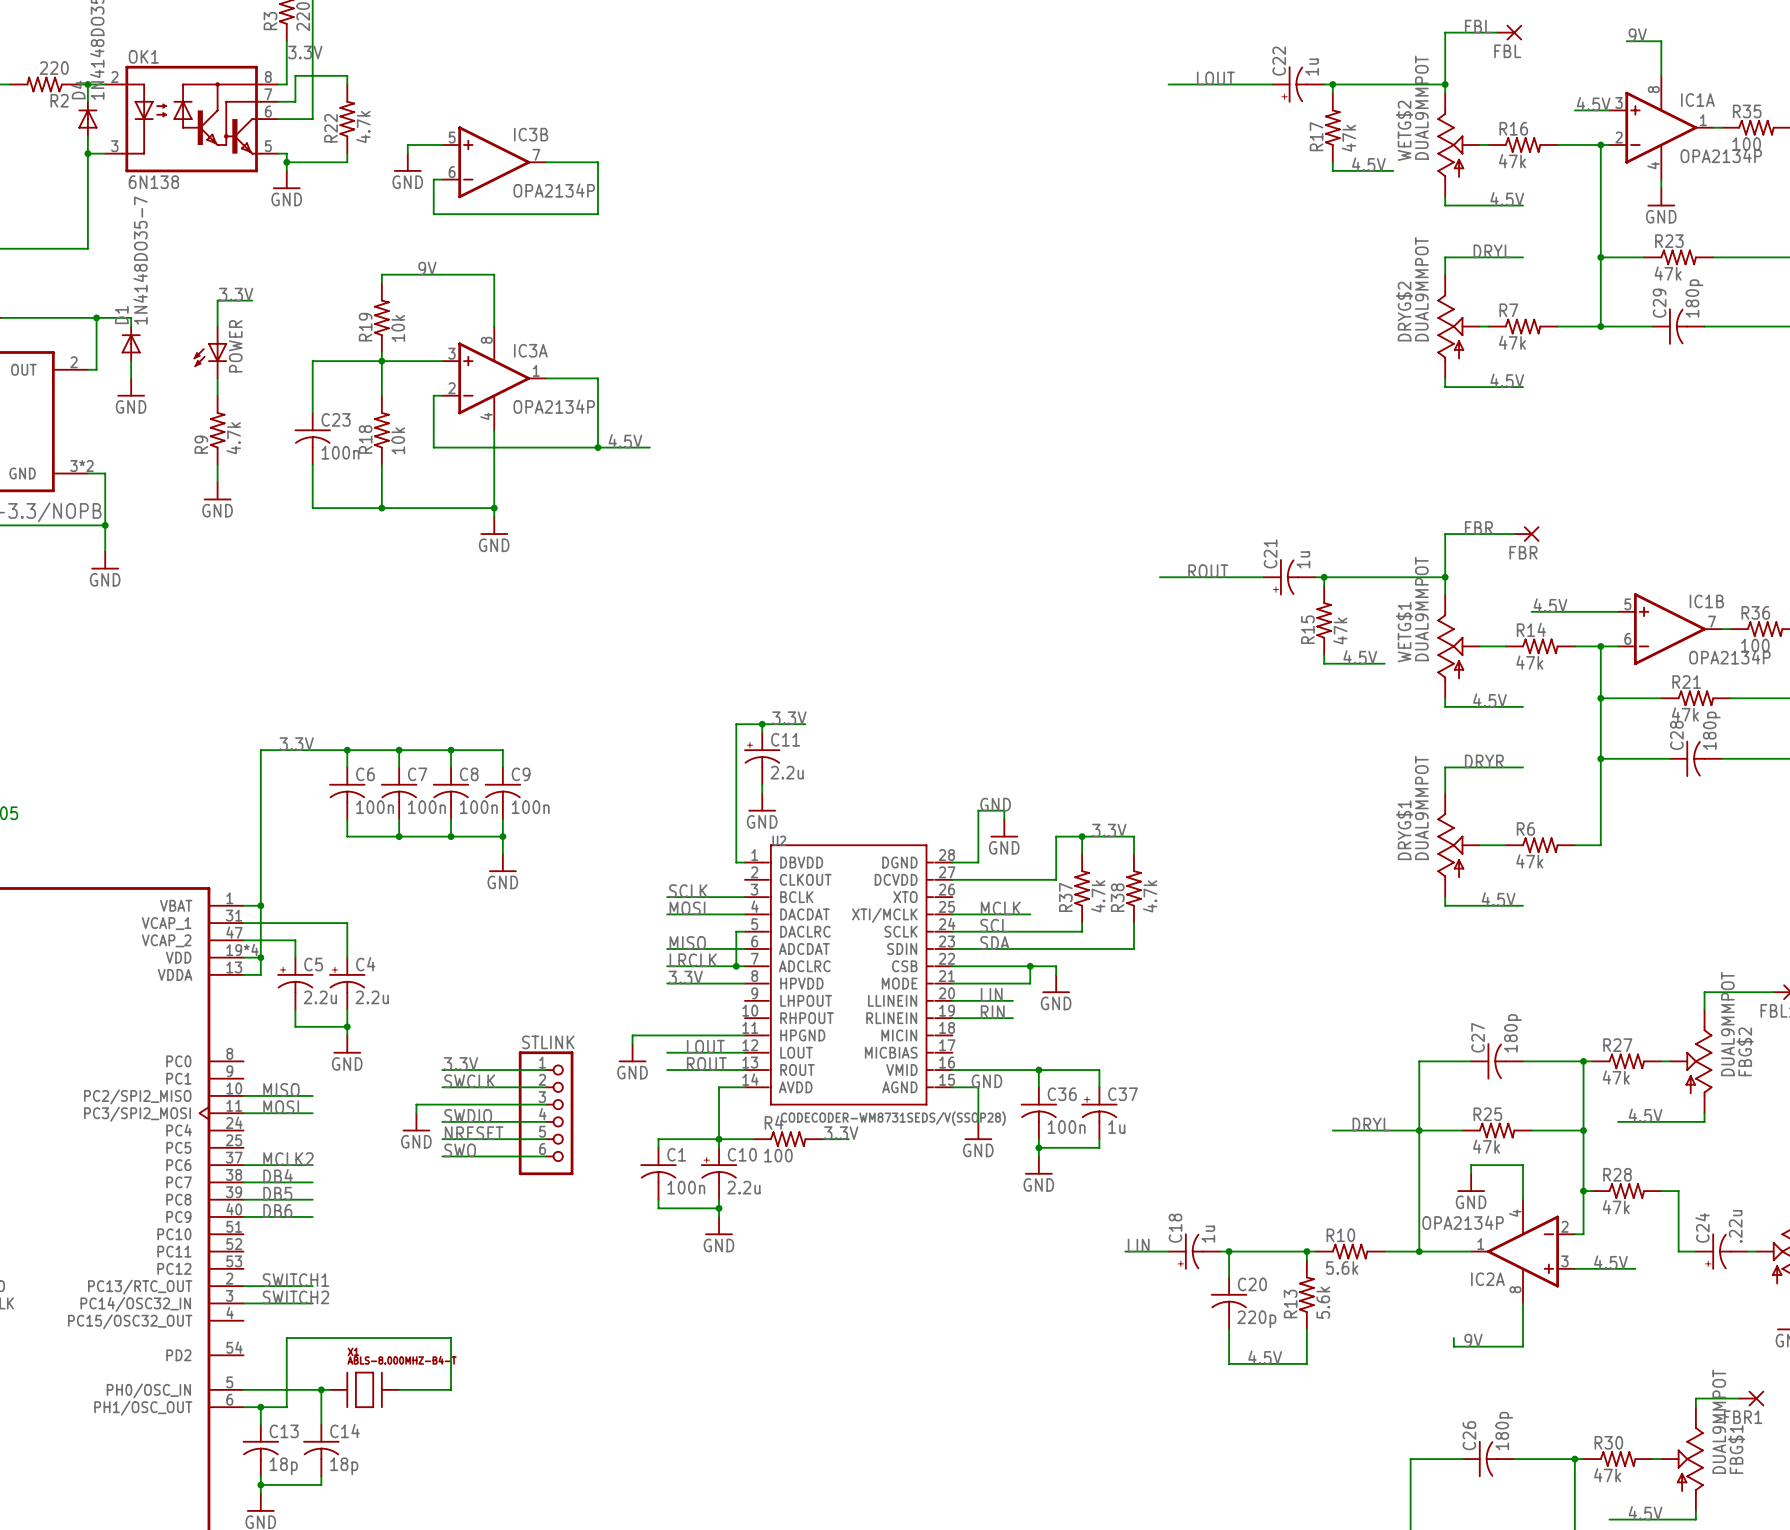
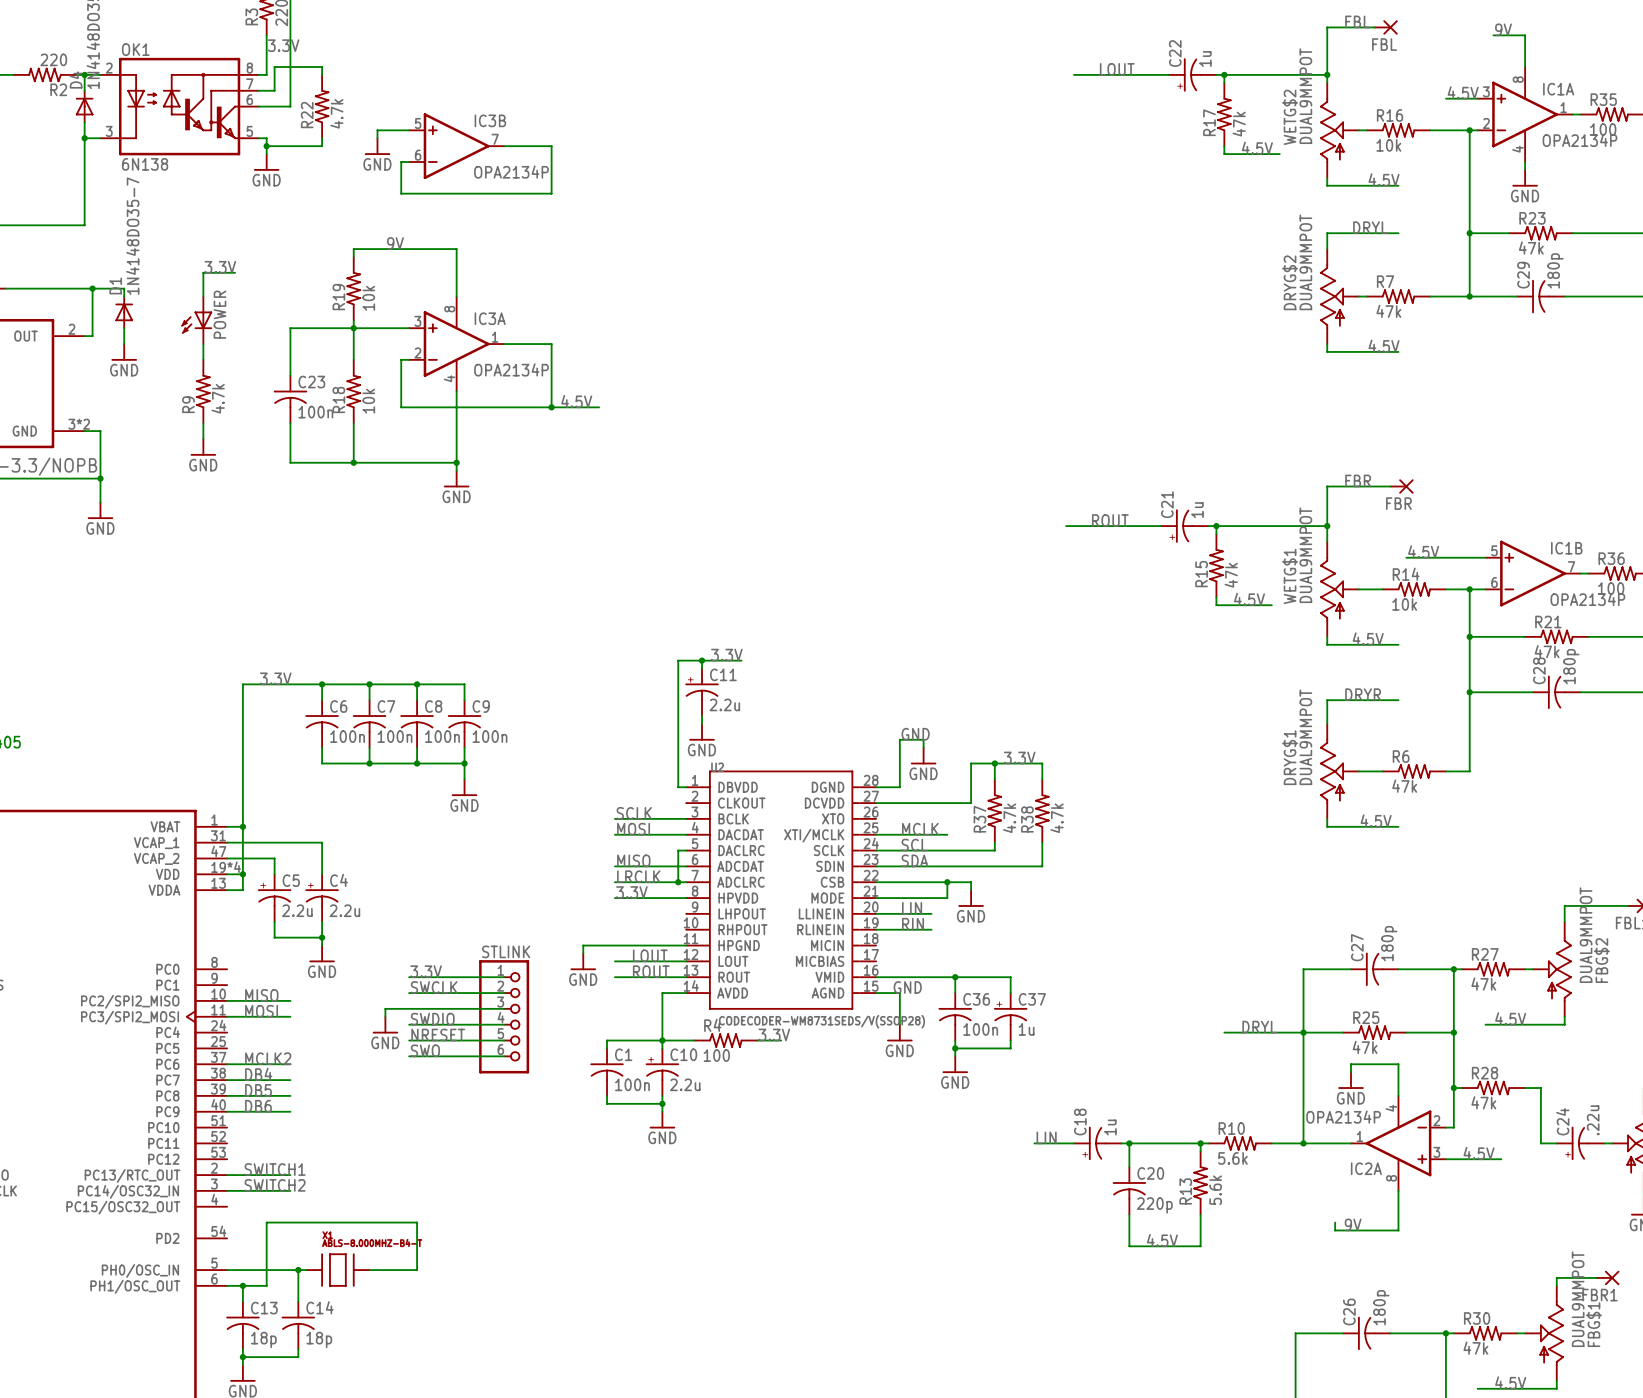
R16 value: 47k (1512, 161) -> 10k (1388, 145)
R14 value: 47k (1529, 662) -> 10k (1404, 604)

